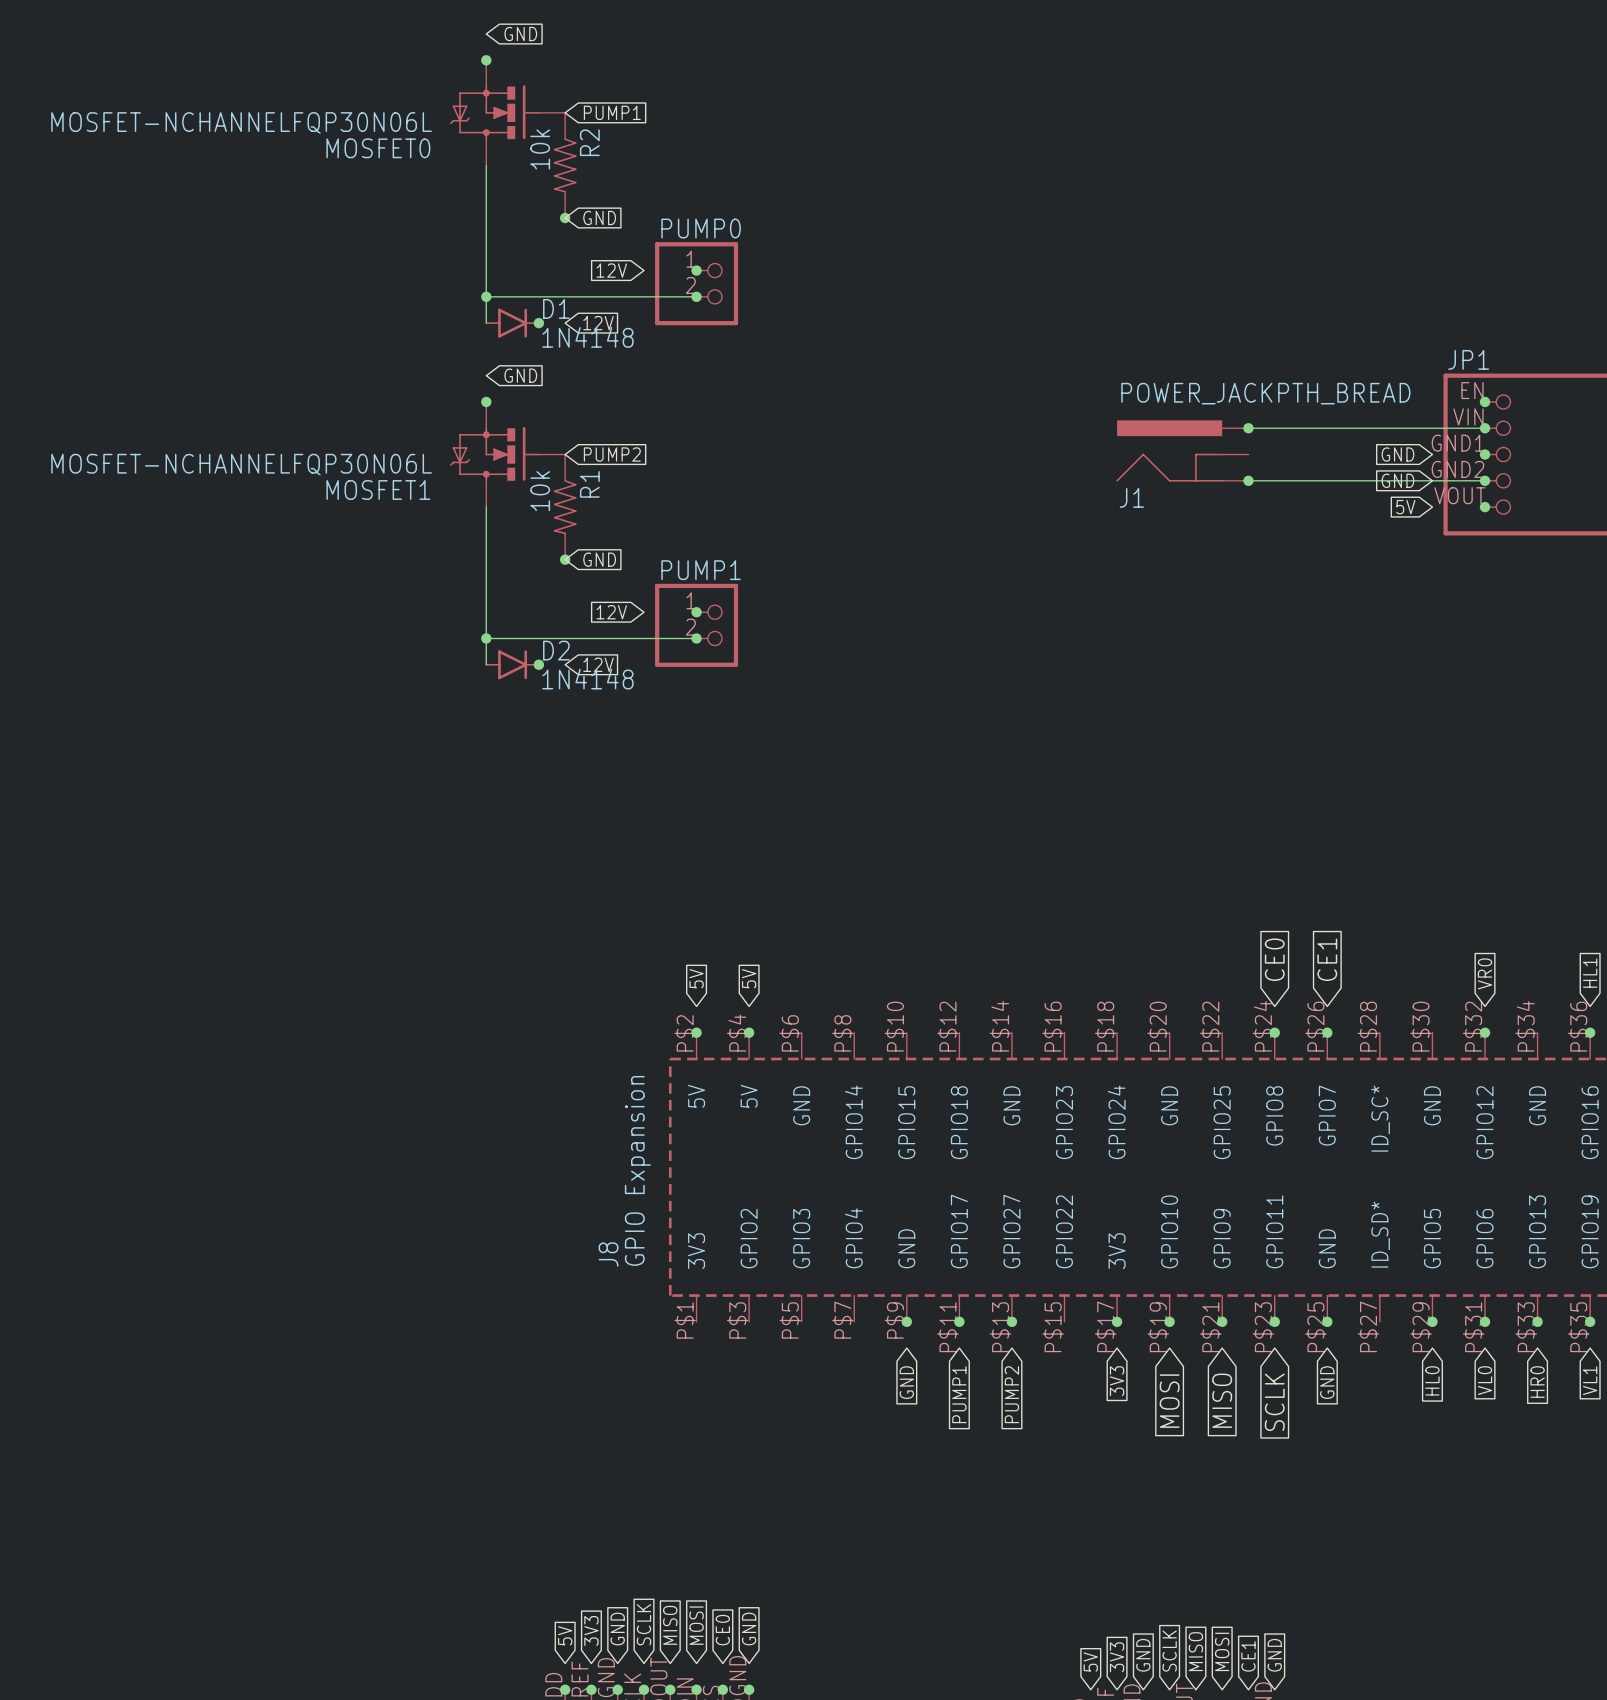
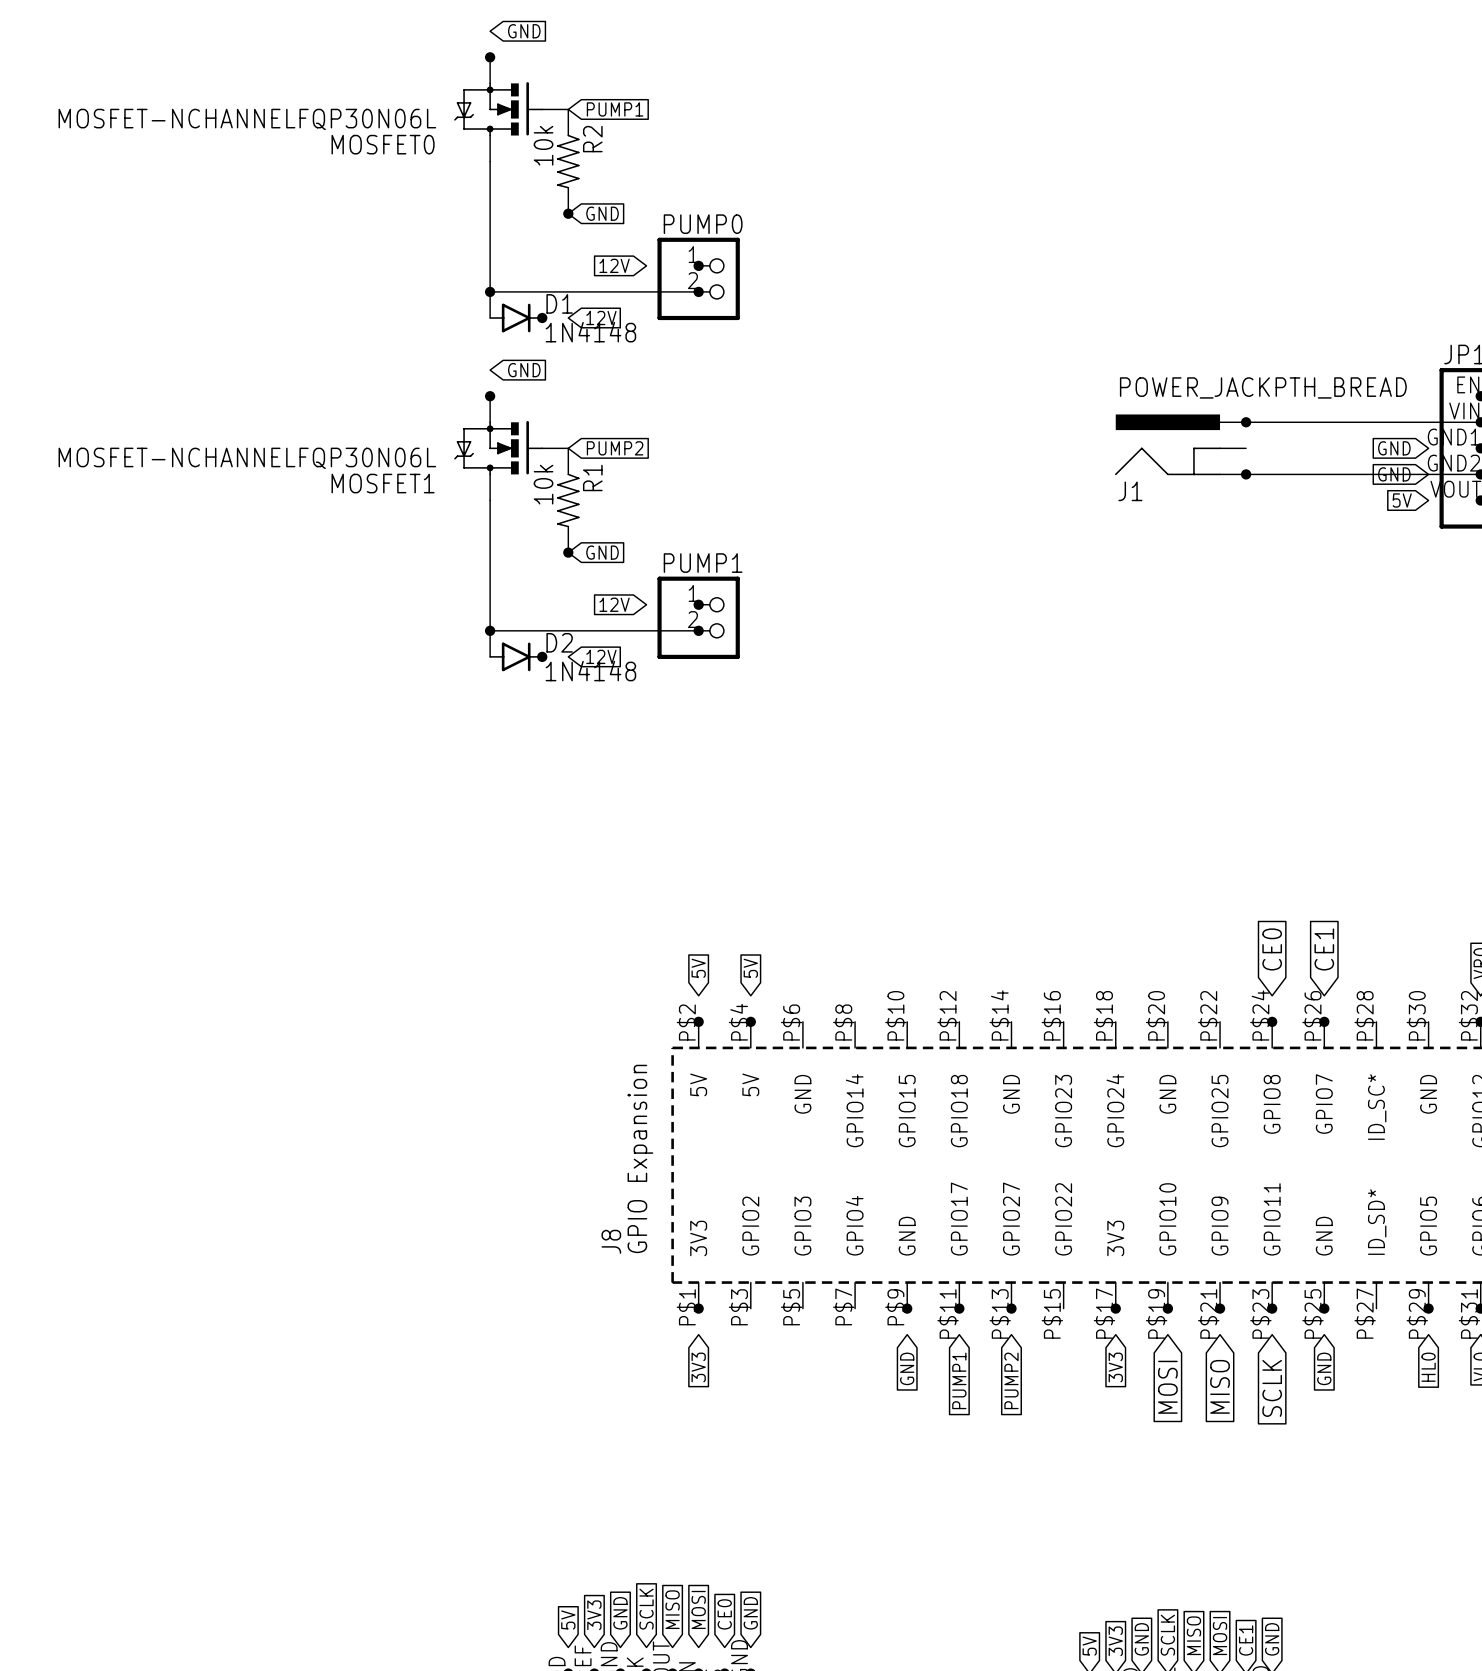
junction: none -> (698, 1308)
global label: none -> 3V3 (698, 1367)

